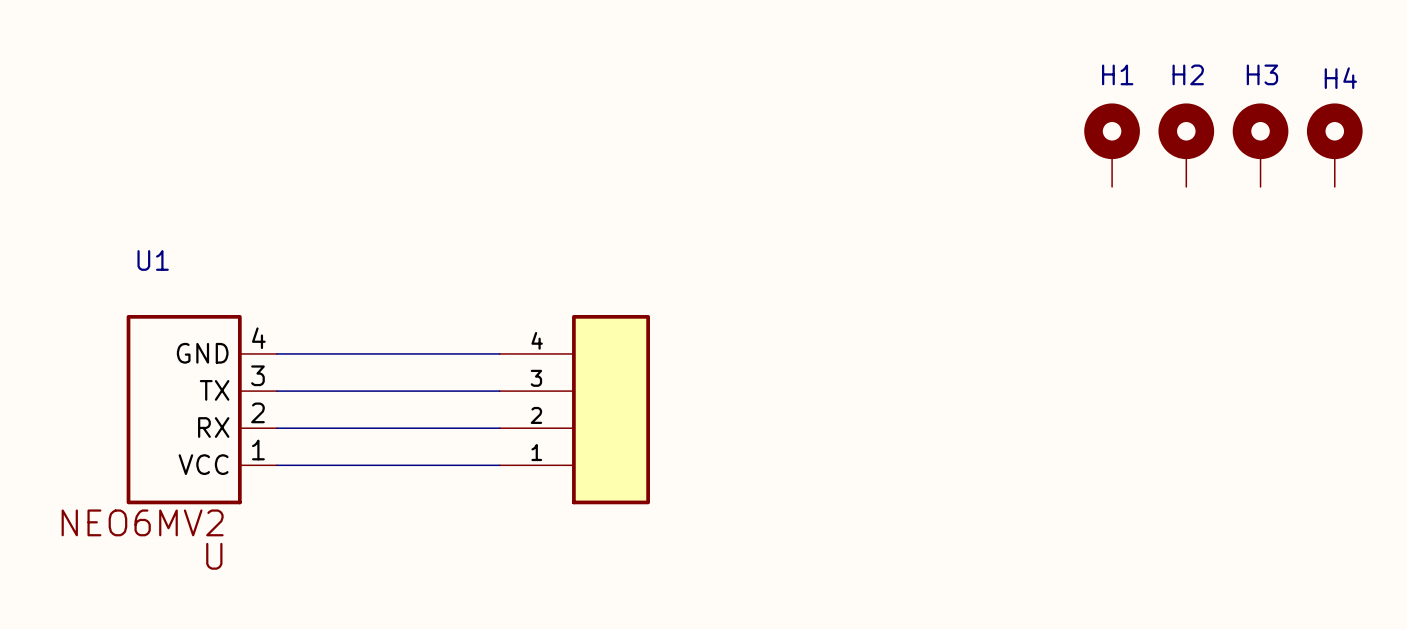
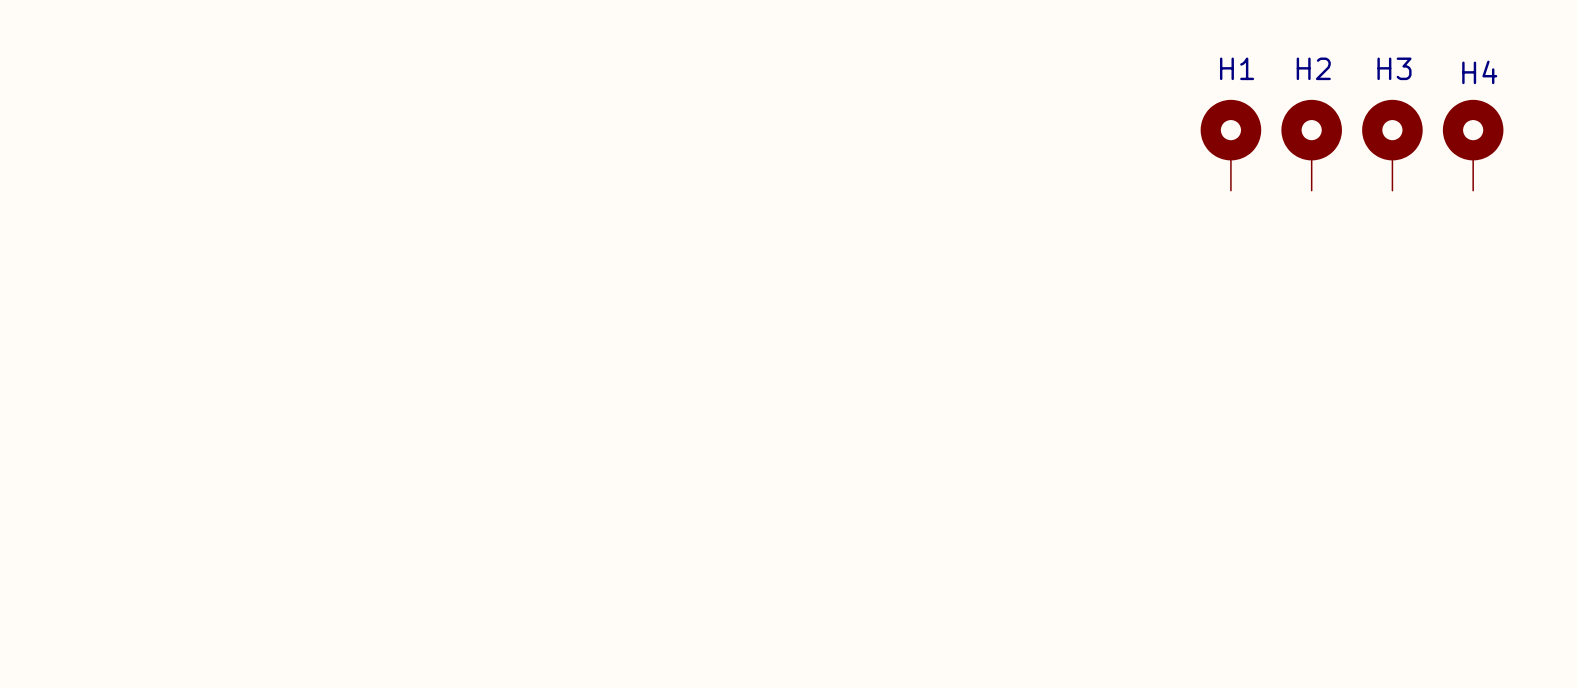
wire: (276, 353) (499, 353) -> none
wire: (276, 391) (499, 391) -> none
U1: (201, 409) -> none
part: (574, 409) -> none
wire: (276, 428) (499, 428) -> none
wire: (276, 465) (499, 465) -> none

